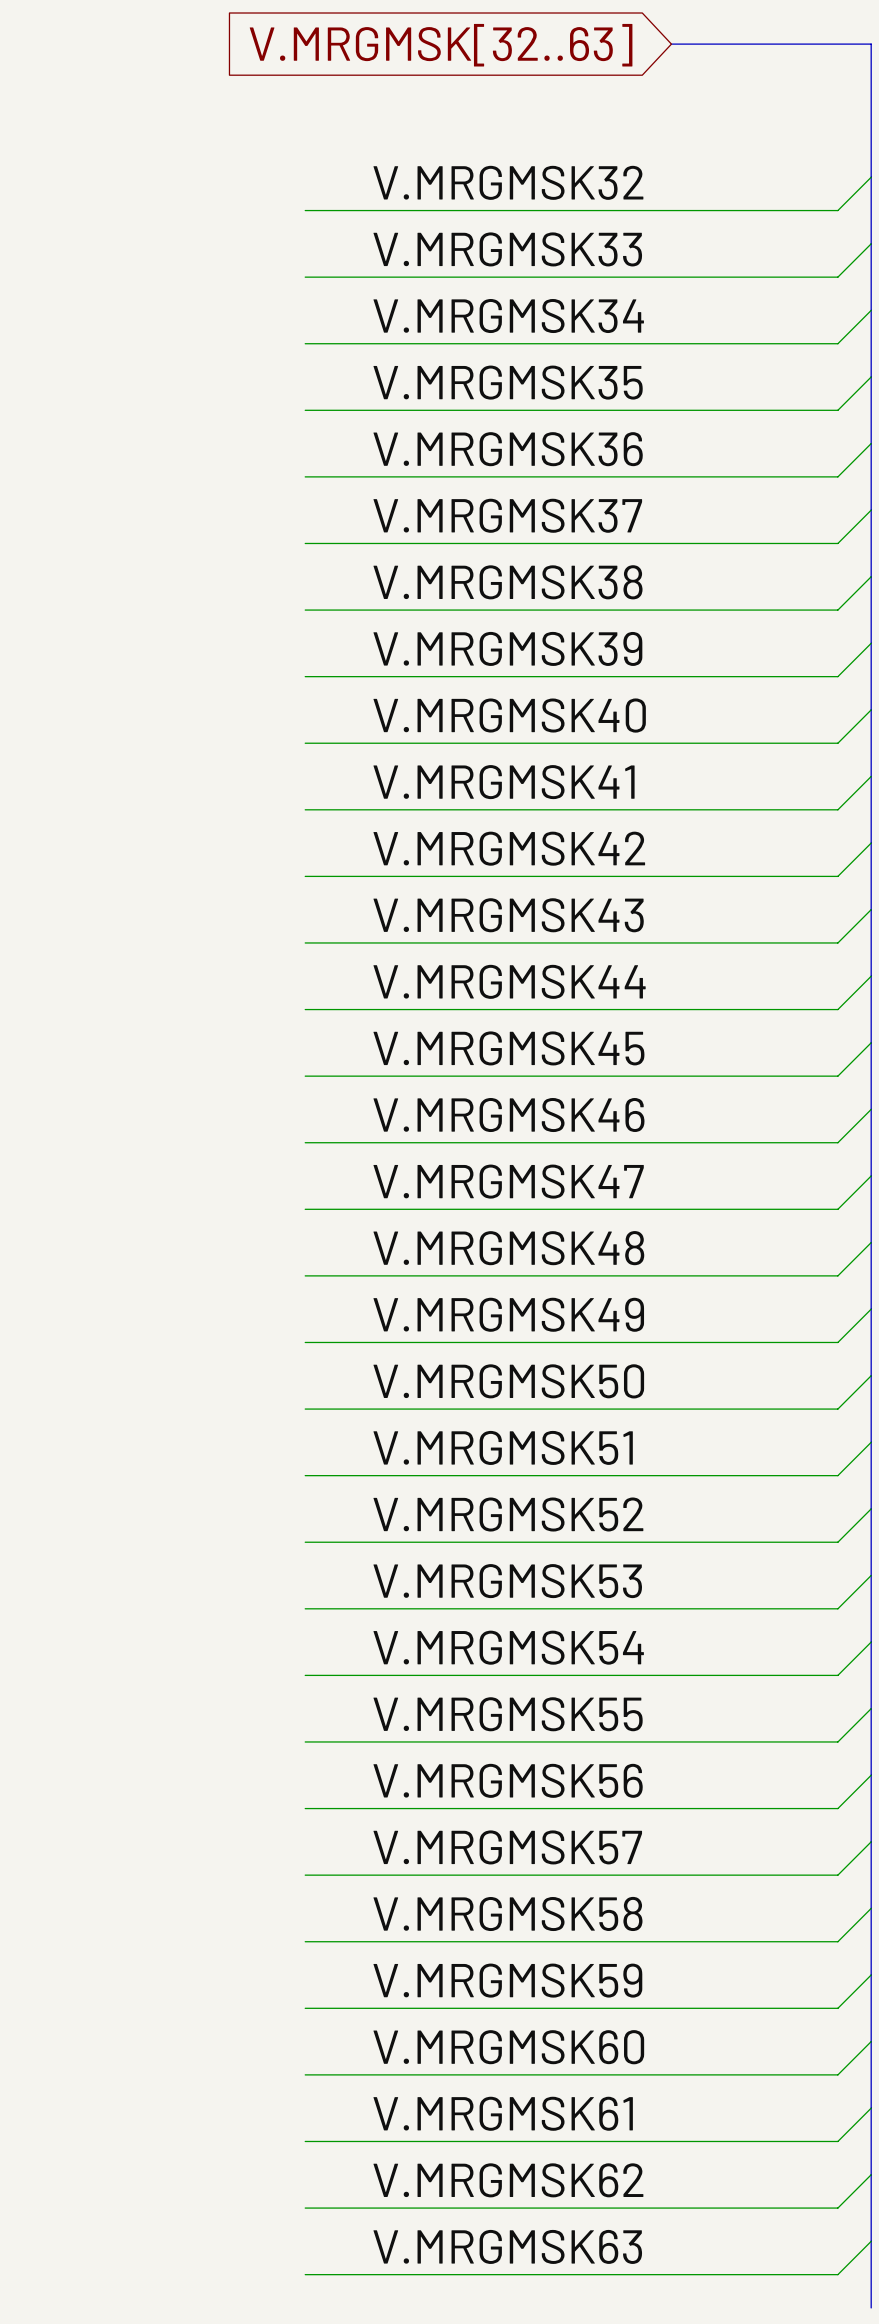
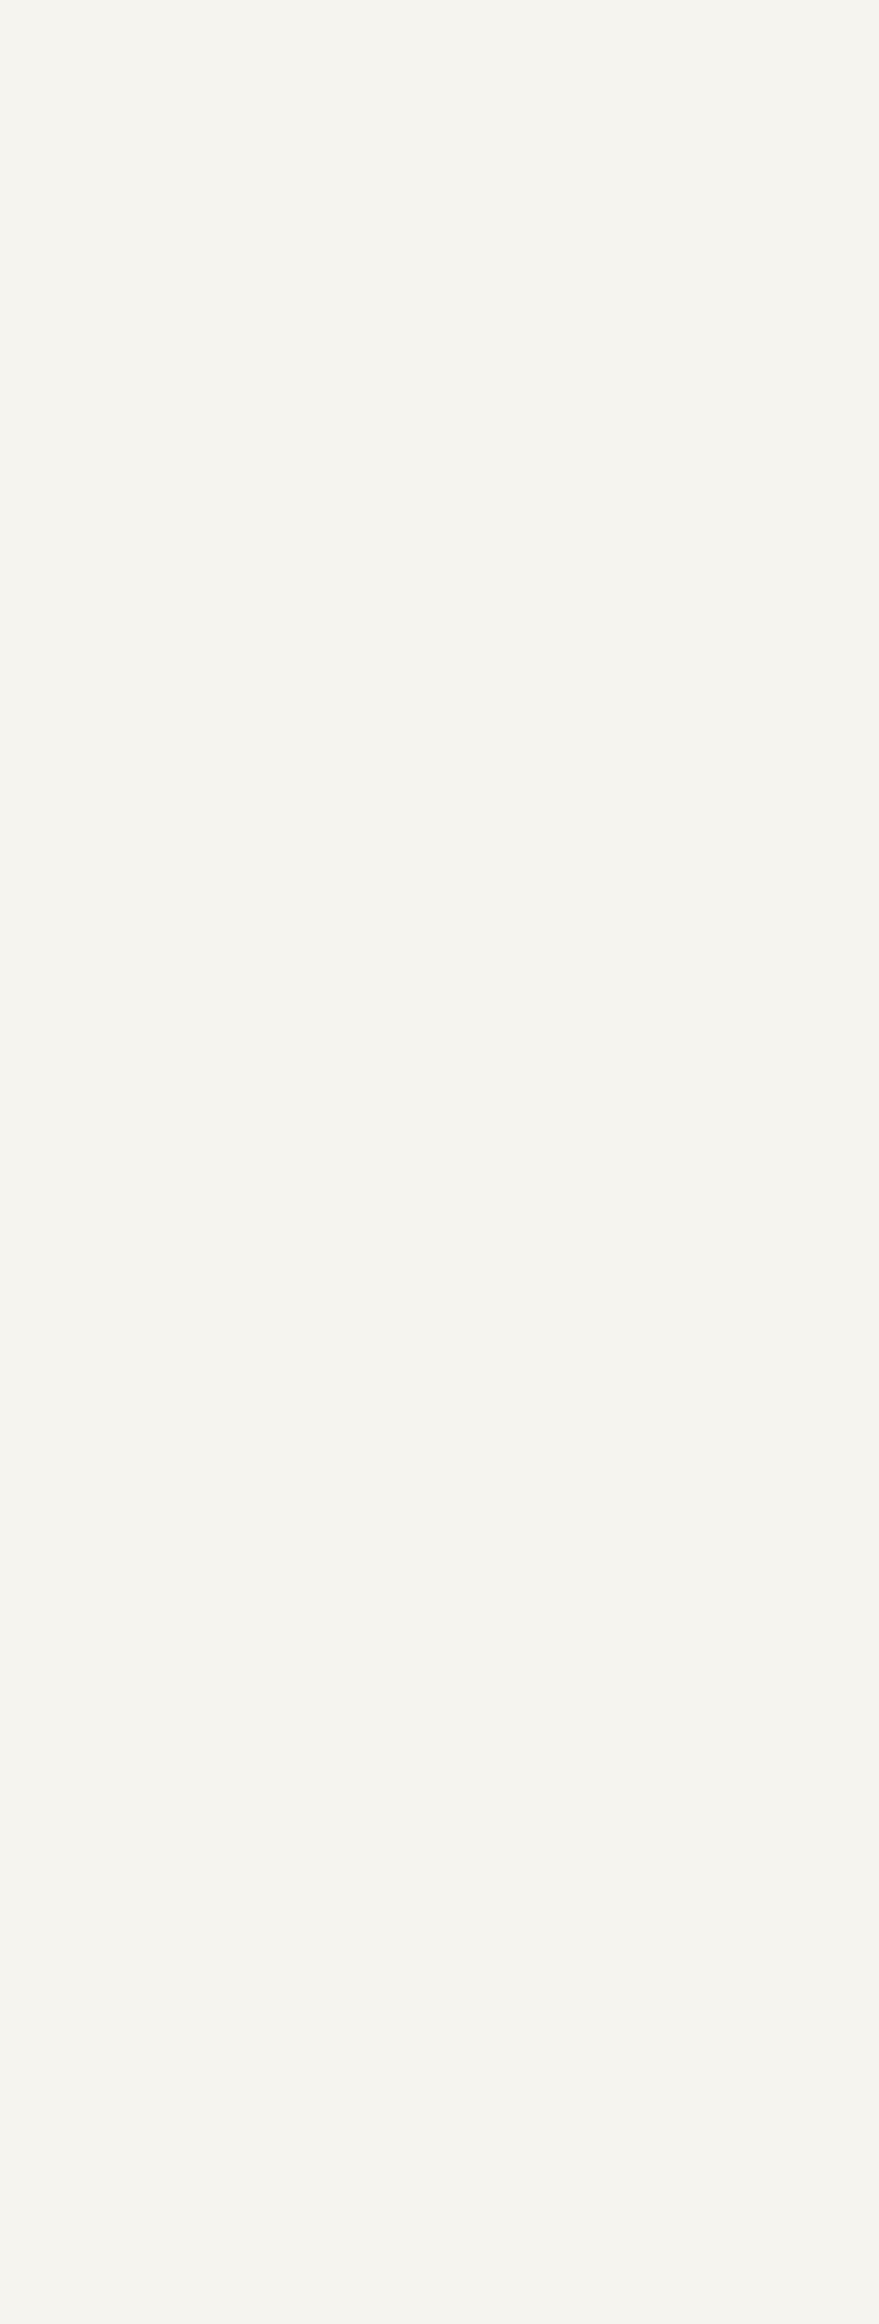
bus: (671, 44) (871, 44) (871, 2307) -> none
global label: V.MRGMSK[32..63] (441, 45) -> none
wire: (871, 177) (837, 210) (305, 210) -> none
label: V.MRGMSK32 (508, 182) -> none
wire: (871, 243) (837, 277) (305, 277) -> none
label: V.MRGMSK33 (507, 249) -> none
wire: (871, 310) (837, 343) (305, 343) -> none
label: V.MRGMSK34 (508, 316) -> none
wire: (871, 377) (837, 410) (305, 410) -> none
label: V.MRGMSK35 (508, 382) -> none
wire: (871, 443) (837, 476) (305, 476) -> none
label: V.MRGMSK36 (508, 449) -> none
wire: (871, 510) (837, 543) (305, 543) -> none
label: V.MRGMSK37 (507, 515) -> none
wire: (871, 576) (837, 610) (305, 610) -> none
label: V.MRGMSK38 (508, 582) -> none
wire: (871, 643) (837, 676) (305, 676) -> none
label: V.MRGMSK39 (507, 648) -> none
wire: (871, 709) (837, 743) (305, 743) -> none
label: V.MRGMSK40 (509, 715) -> none
wire: (871, 776) (837, 809) (305, 809) -> none
label: V.MRGMSK41 (504, 782) -> none
wire: (871, 843) (837, 876) (305, 876) -> none
label: V.MRGMSK42 (509, 848) -> none
wire: (871, 909) (837, 942) (305, 942) -> none
label: V.MRGMSK43 (508, 915) -> none
wire: (871, 976) (837, 1009) (305, 1009) -> none
label: V.MRGMSK44 (509, 981) -> none
wire: (871, 1042) (837, 1076) (305, 1076) -> none
label: V.MRGMSK45 (508, 1048) -> none
wire: (871, 1109) (837, 1142) (305, 1142) -> none
label: V.MRGMSK46 (508, 1115) -> none
wire: (871, 1176) (837, 1209) (305, 1209) -> none
label: V.MRGMSK47 (508, 1181) -> none
wire: (871, 1242) (837, 1275) (305, 1275) -> none
label: V.MRGMSK48 (508, 1248) -> none
wire: (871, 1309) (837, 1342) (305, 1342) -> none
label: V.MRGMSK49 (508, 1314) -> none
wire: (871, 1375) (837, 1409) (305, 1409) -> none
label: V.MRGMSK50 (508, 1381) -> none
wire: (871, 1442) (837, 1475) (305, 1475) -> none
label: V.MRGMSK51 (503, 1447) -> none
wire: (871, 1508) (837, 1542) (305, 1542) -> none
label: V.MRGMSK52 (508, 1514) -> none
wire: (871, 1575) (837, 1608) (305, 1608) -> none
label: V.MRGMSK53 (507, 1581) -> none
wire: (871, 1642) (837, 1675) (305, 1675) -> none
label: V.MRGMSK54 (508, 1647) -> none
wire: (871, 1708) (837, 1741) (305, 1741) -> none
label: V.MRGMSK55 (508, 1714) -> none
wire: (871, 1775) (837, 1808) (305, 1808) -> none
label: V.MRGMSK56 (508, 1780) -> none
wire: (871, 1841) (837, 1875) (305, 1875) -> none
label: V.MRGMSK57 (507, 1847) -> none
wire: (871, 1908) (837, 1941) (305, 1941) -> none
label: V.MRGMSK58 (507, 1913) -> none
wire: (871, 1975) (837, 2008) (305, 2008) -> none
label: V.MRGMSK59 (507, 1980) -> none
wire: (871, 2041) (837, 2074) (305, 2074) -> none
label: V.MRGMSK60 (508, 2047) -> none
wire: (871, 2108) (837, 2141) (305, 2141) -> none
label: V.MRGMSK61 (503, 2113) -> none
wire: (871, 2174) (837, 2208) (305, 2208) -> none
label: V.MRGMSK62 (508, 2180) -> none
wire: (871, 2241) (837, 2274) (305, 2274) -> none
label: V.MRGMSK63 (507, 2246) -> none

